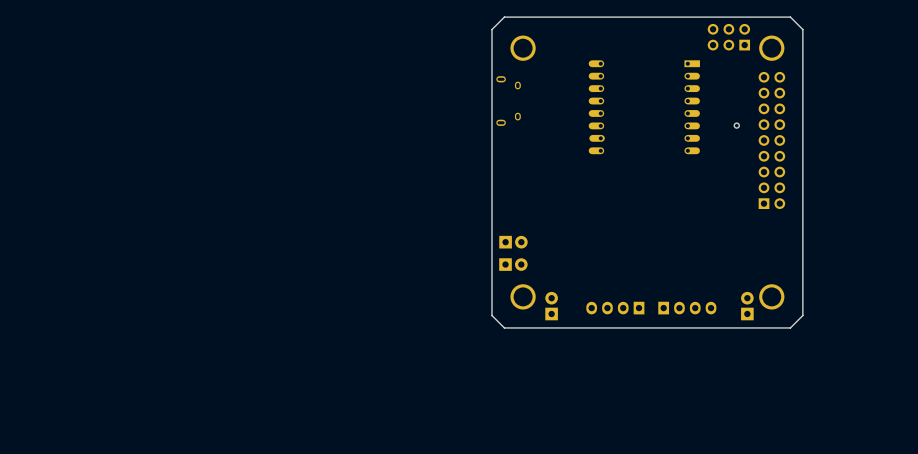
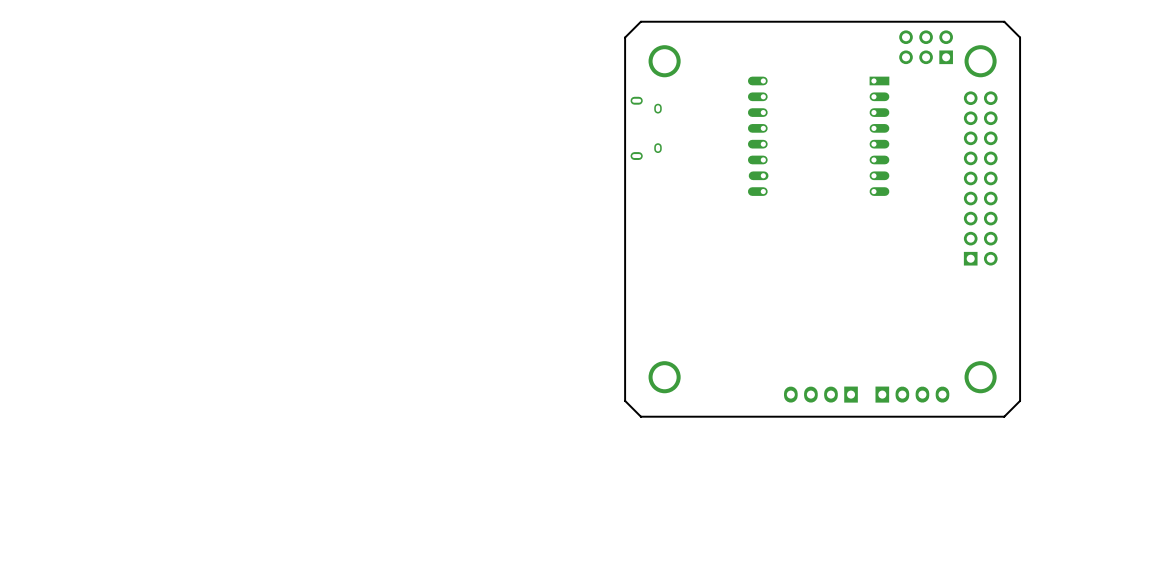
part: (736, 125) -> none
part: (513, 242) -> none
part: (513, 264) -> none
part: (551, 306) -> none
part: (747, 306) -> none
part: (615, 308) -> none
part: (687, 308) -> none
part: none -> (820, 394)
part: none -> (912, 394)

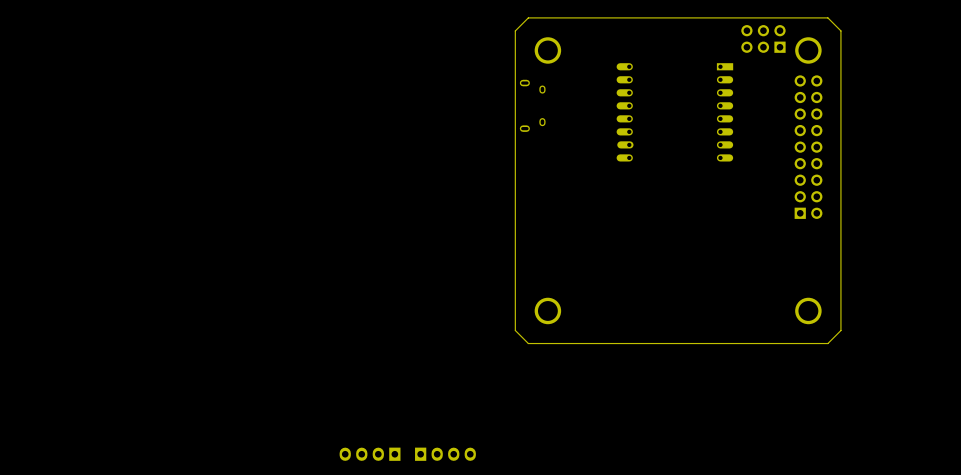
part: (820, 394) -> none
part: (912, 394) -> none
part: none -> (370, 454)
part: none -> (445, 454)

